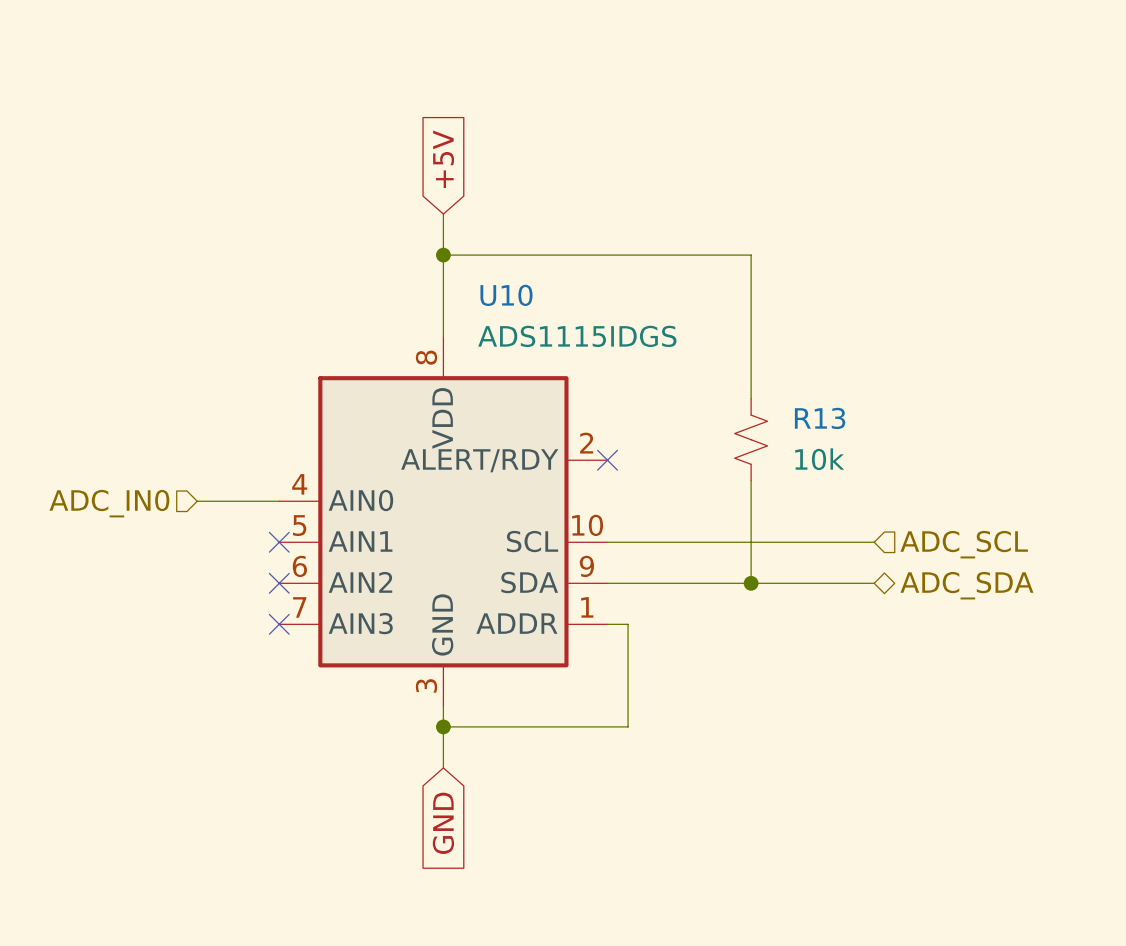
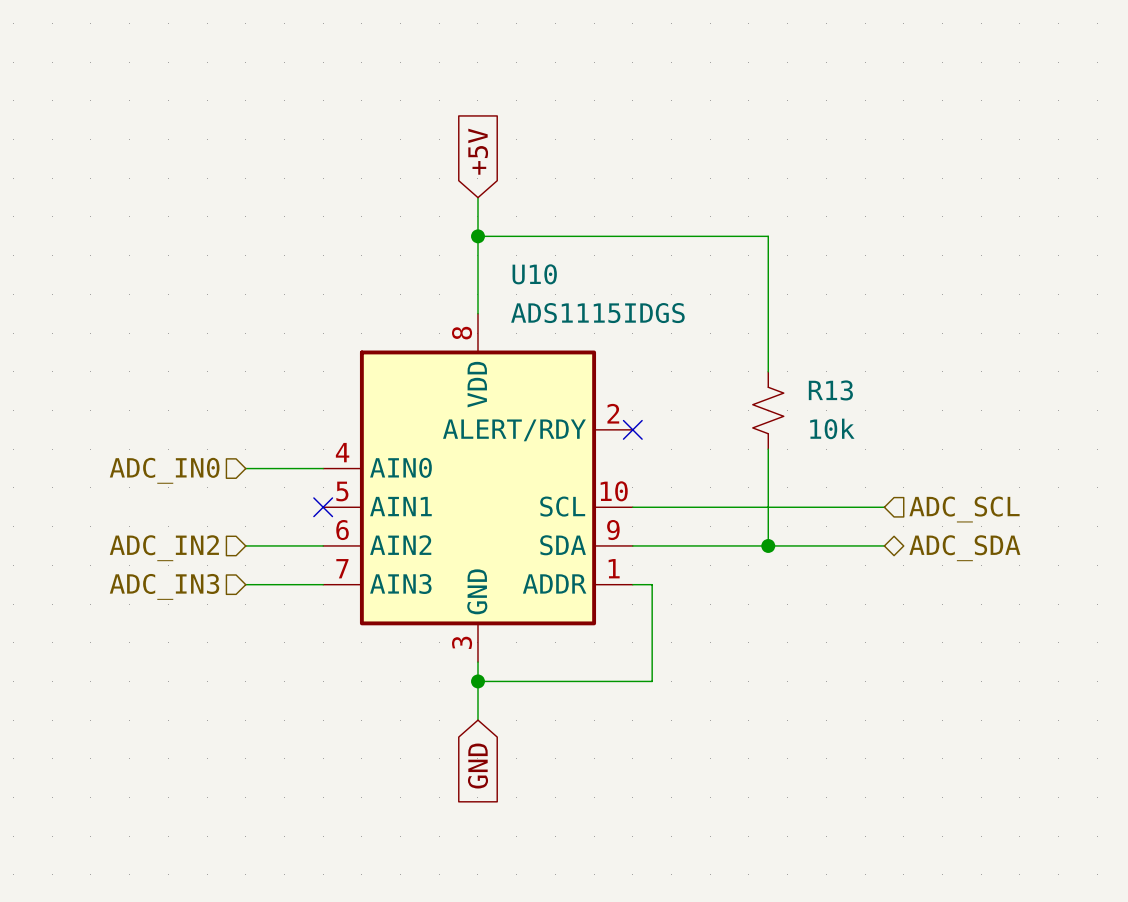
wire: none -> (245, 545) (323, 545)
no-connect mark: (279, 583) -> none
hierarchical label: none -> ADC_IN2 (164, 548)
wire: none -> (245, 584) (323, 584)
no-connect mark: (279, 624) -> none
hierarchical label: none -> ADC_IN3 (164, 586)

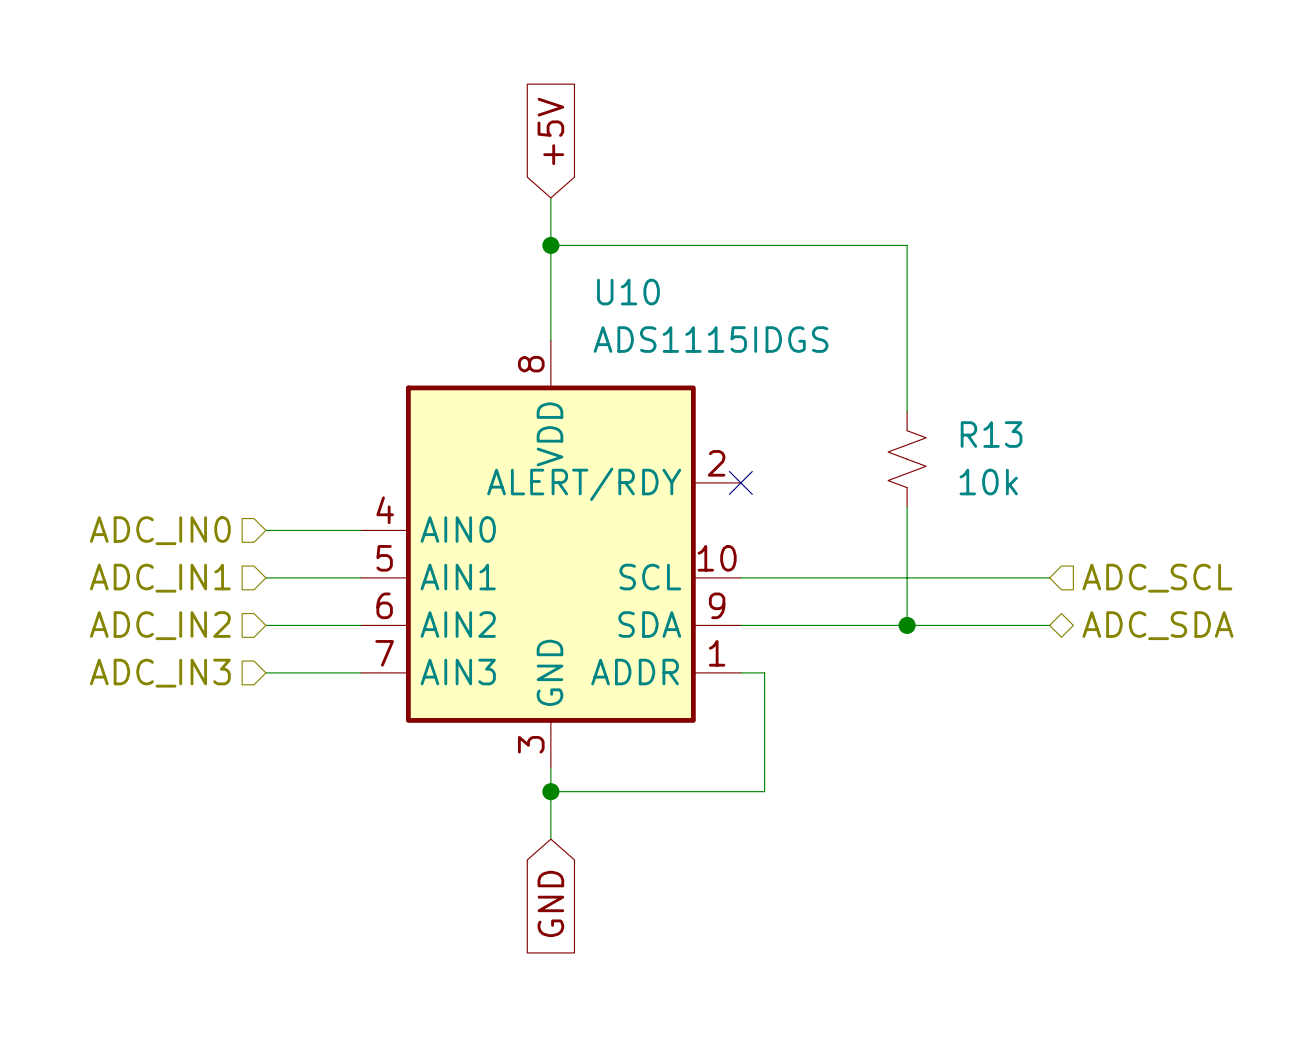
wire: none -> (265, 577) (360, 577)
no-connect mark: (323, 507) -> none
hierarchical label: none -> ADC_IN1 (160, 578)

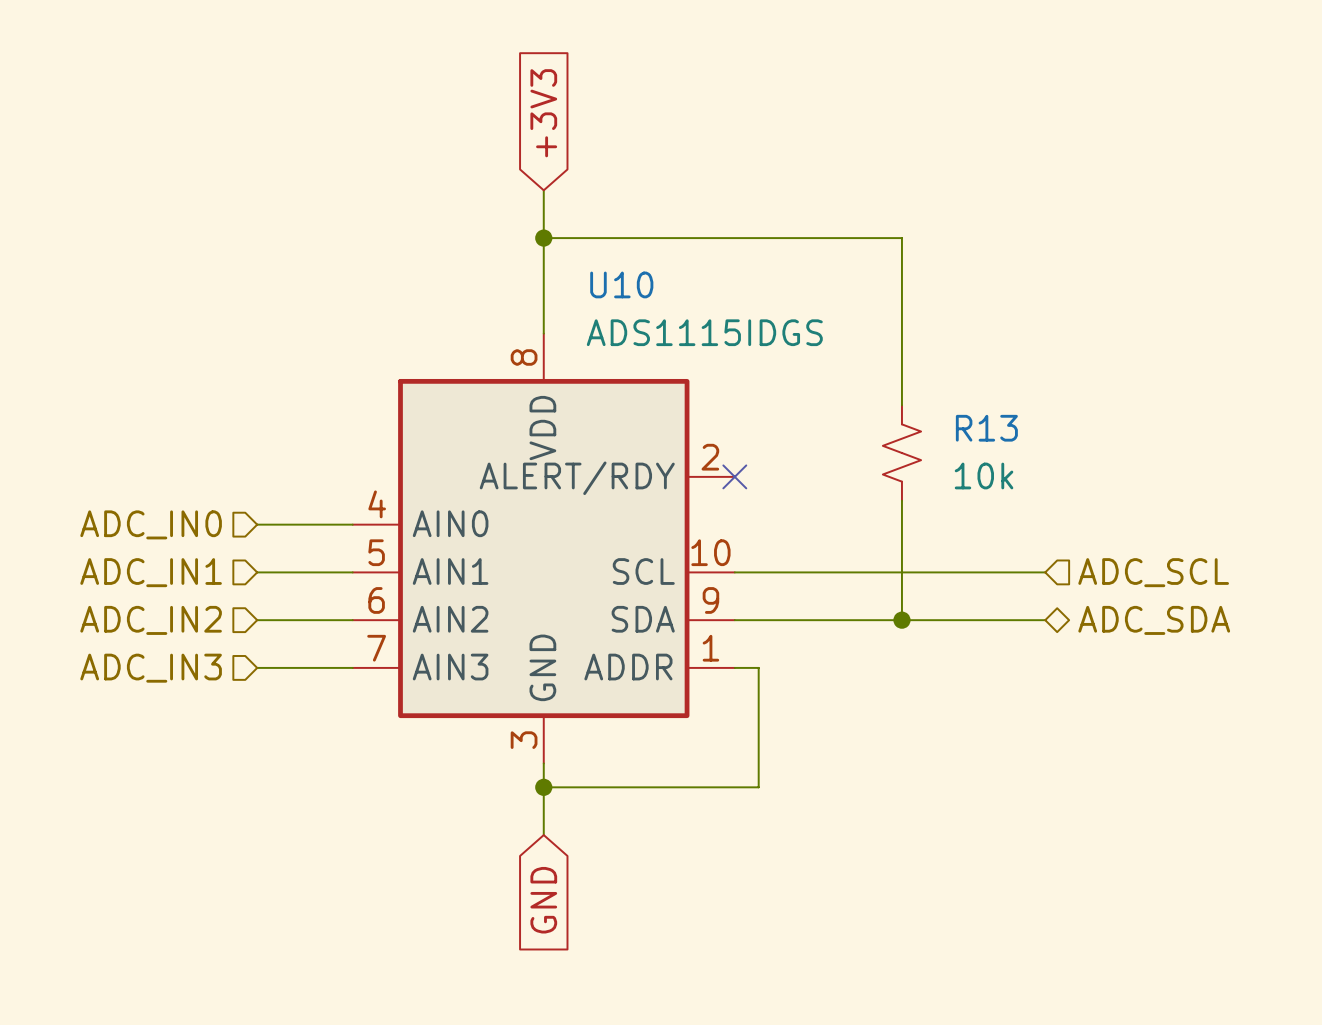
global label: +5V (550, 131) -> +3V3 (543, 113)

